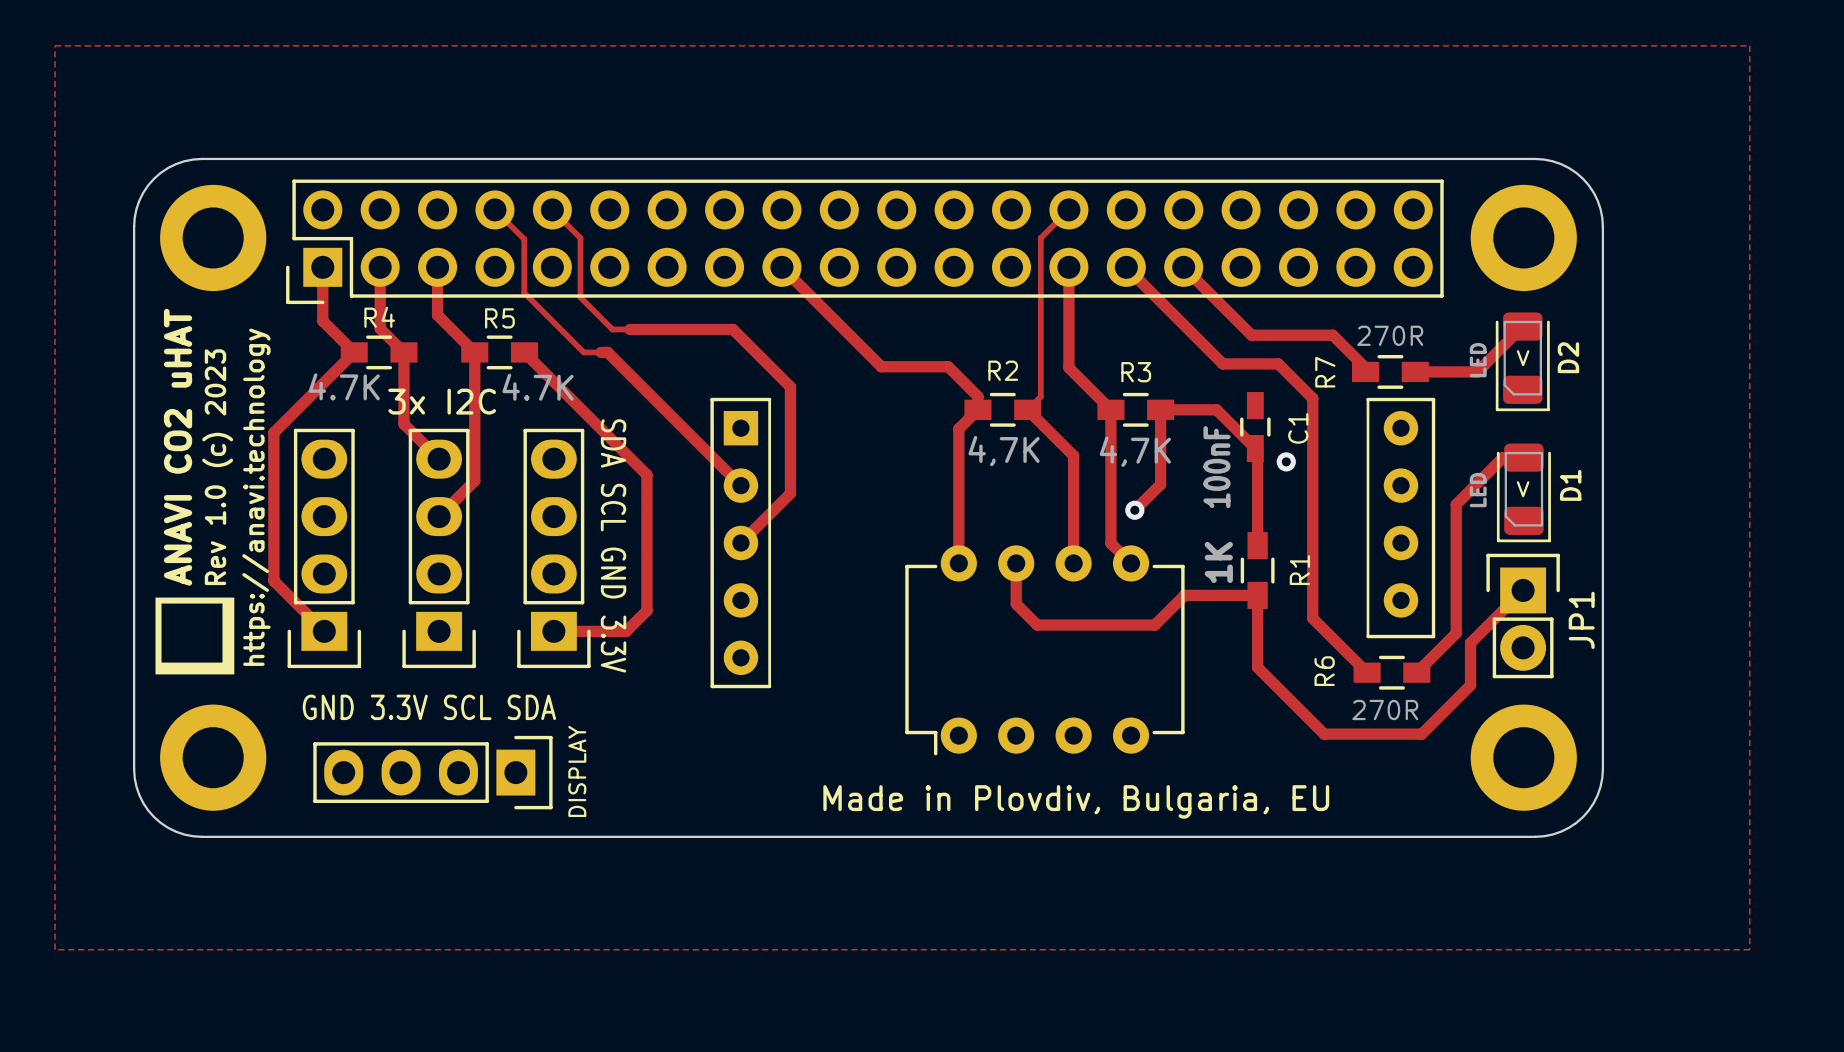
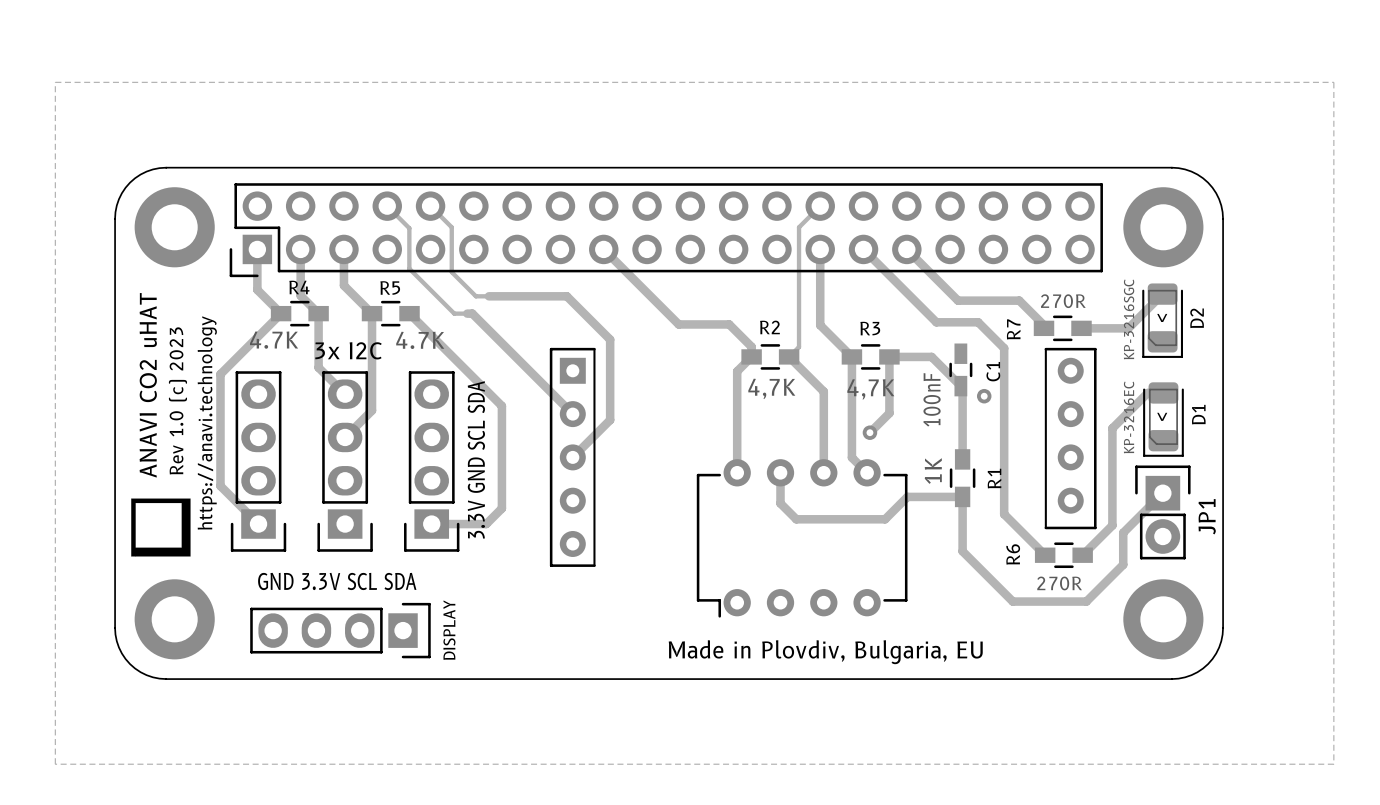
D2 value: LED (1478, 360) -> KP-3216SGC (1129, 319)
D1 value: LED (1478, 490) -> KP-3216EC (1129, 417)
text: SDA SCL GND 3.3V (613, 545) -> 3.3V GND SCL SDA (476, 459)

